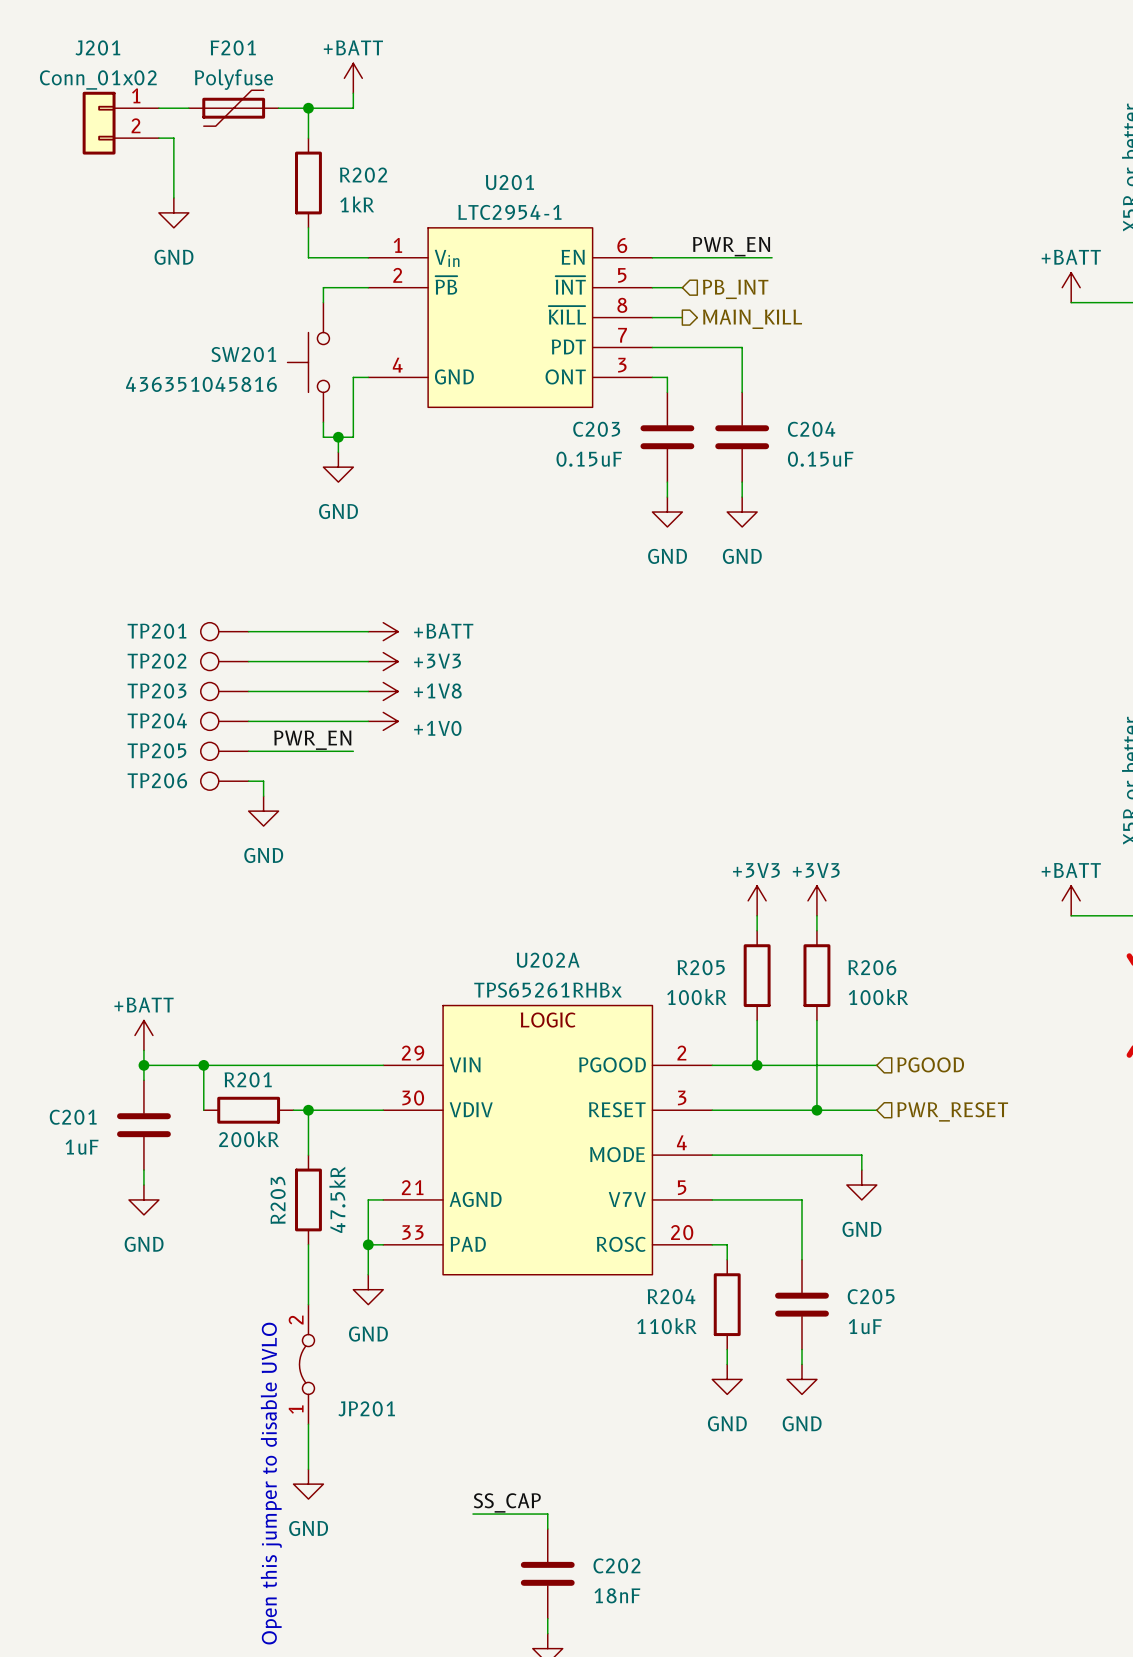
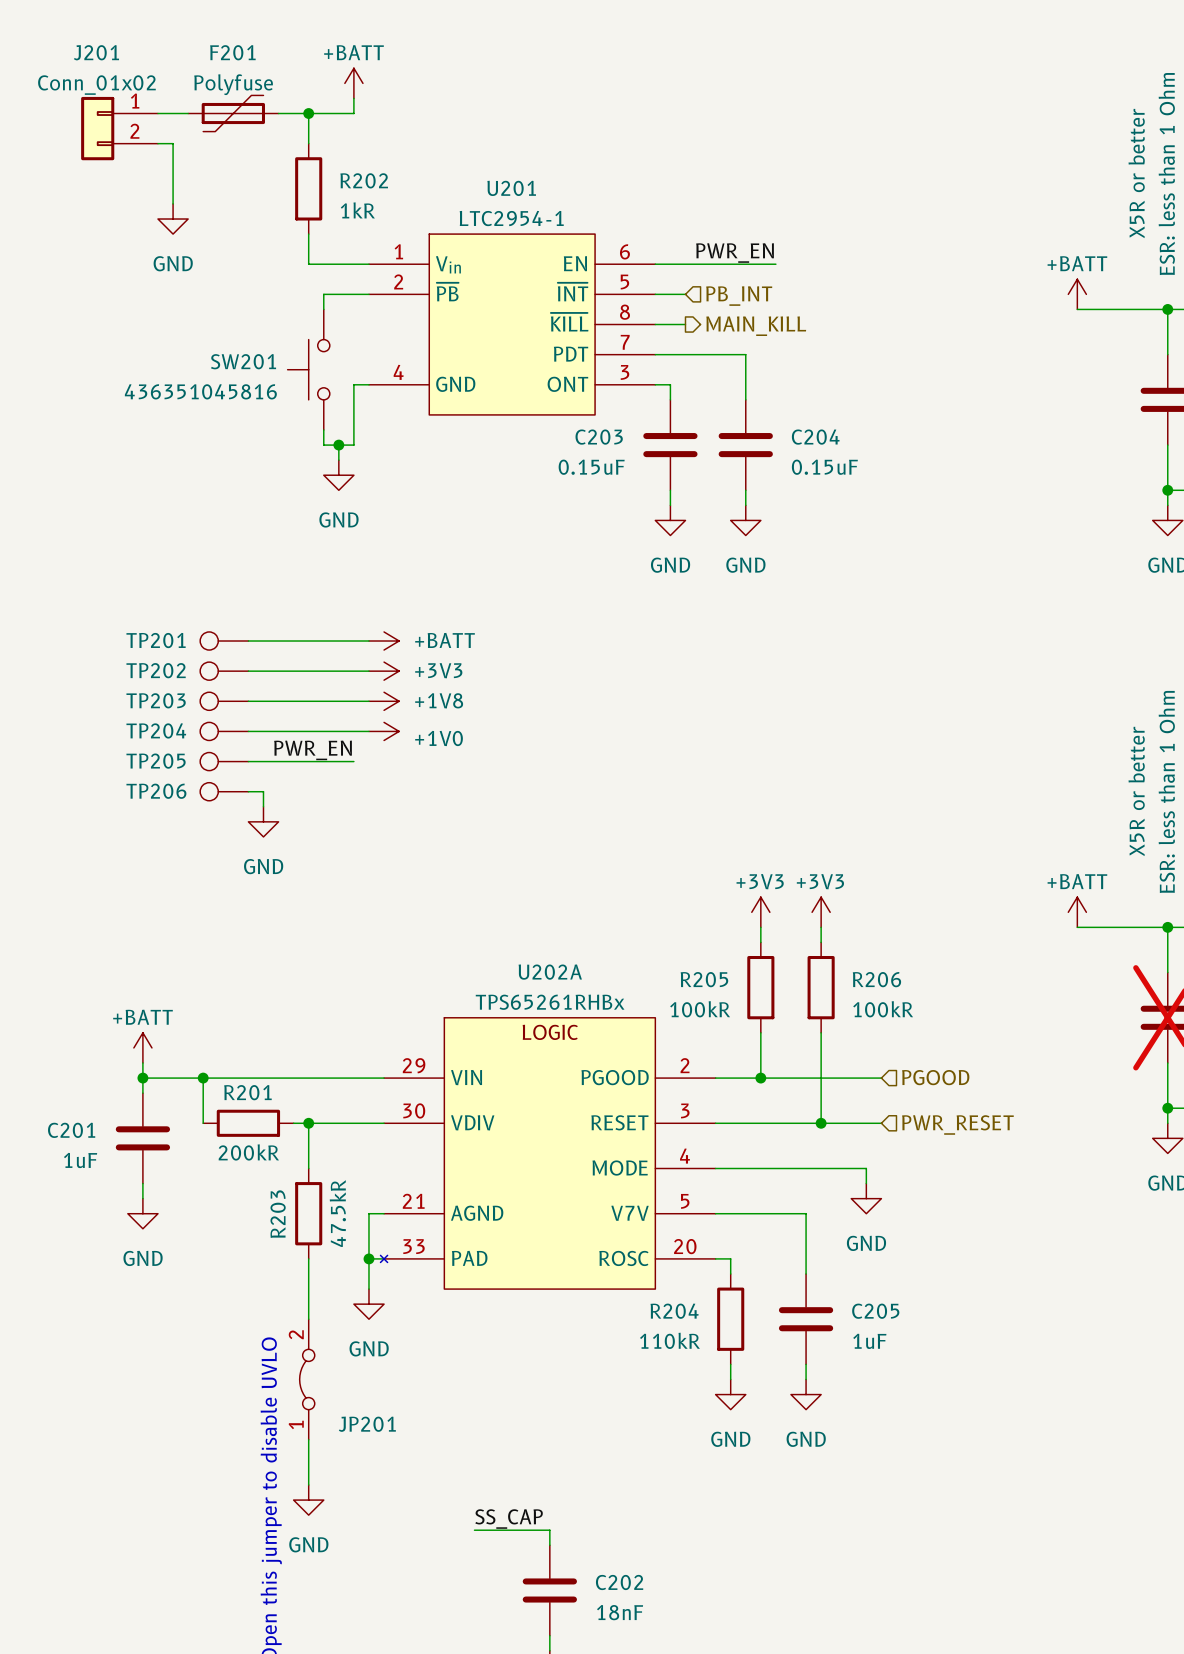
U202A symbol: [383, 1005, 713, 1275] -> [380, 1017, 716, 1290]

